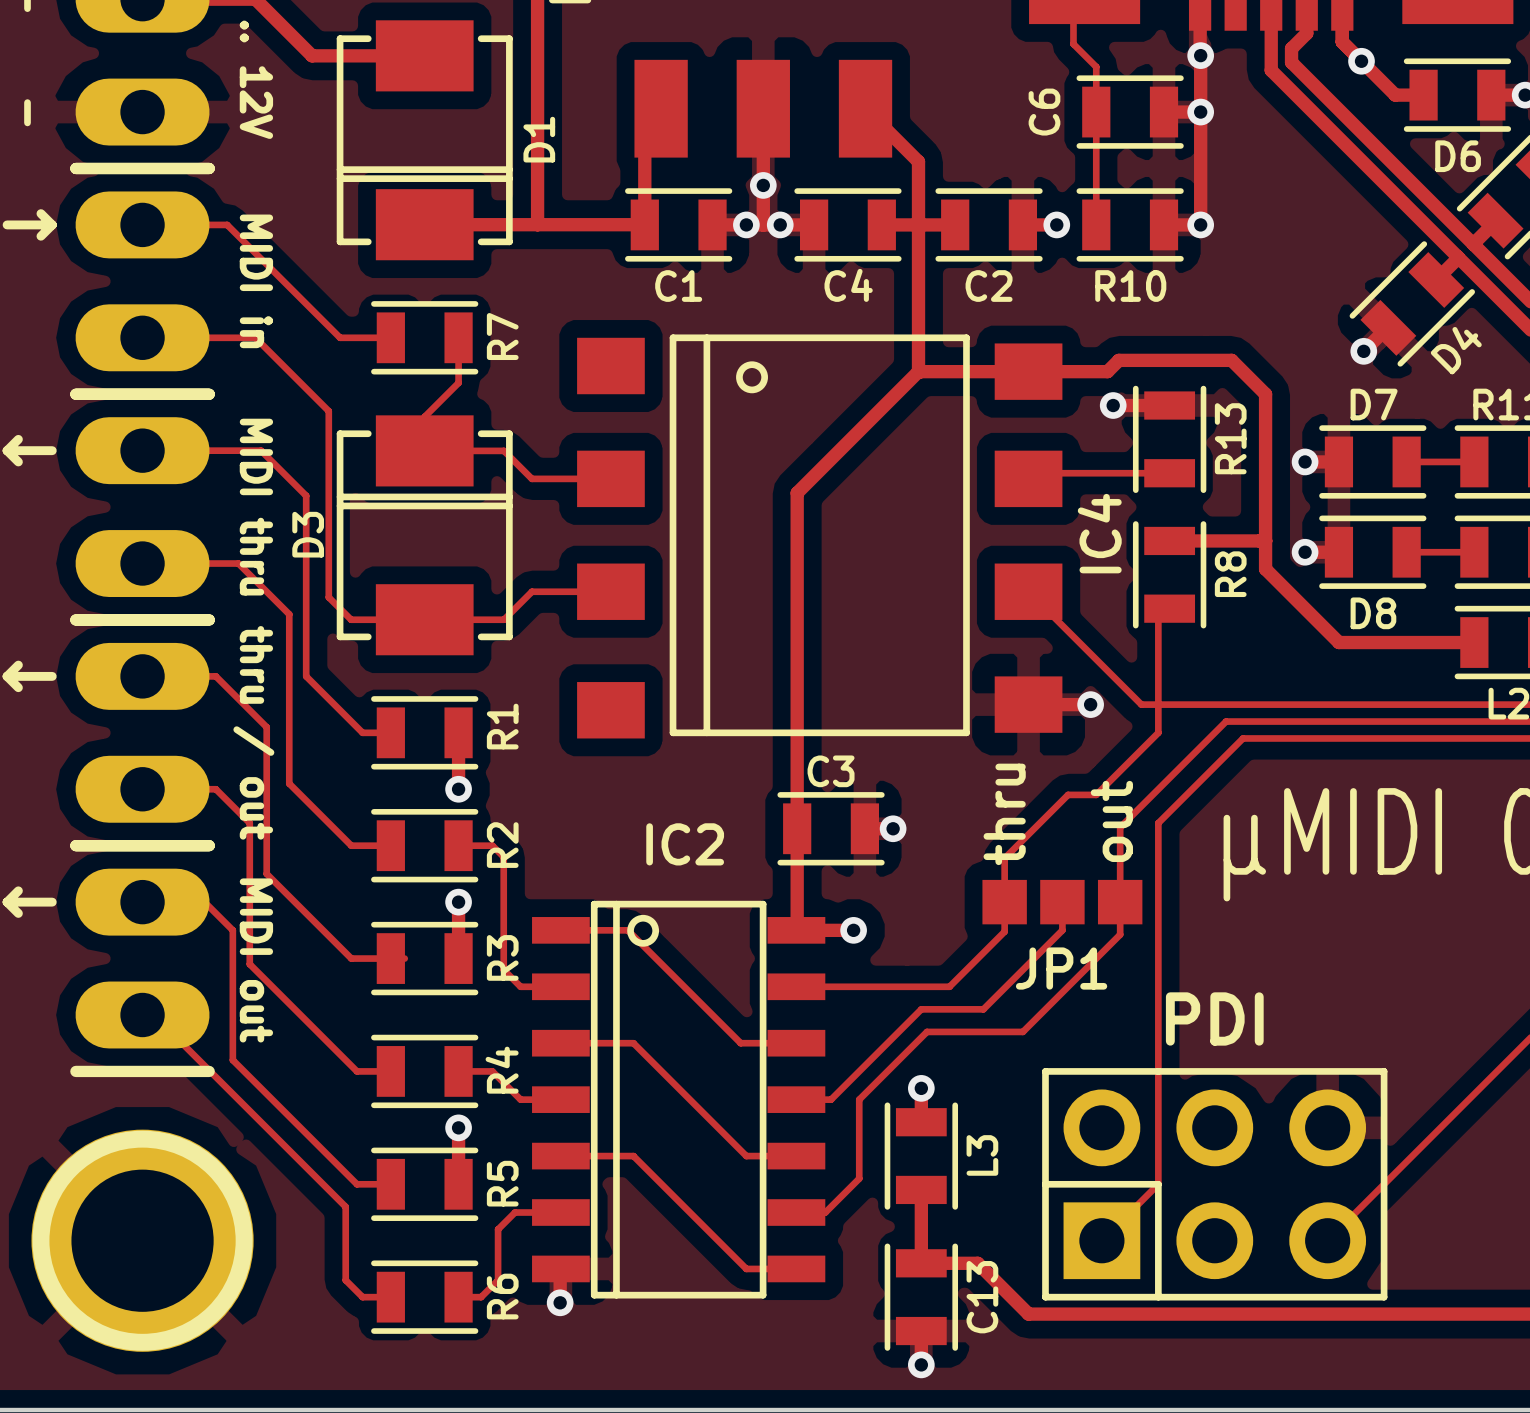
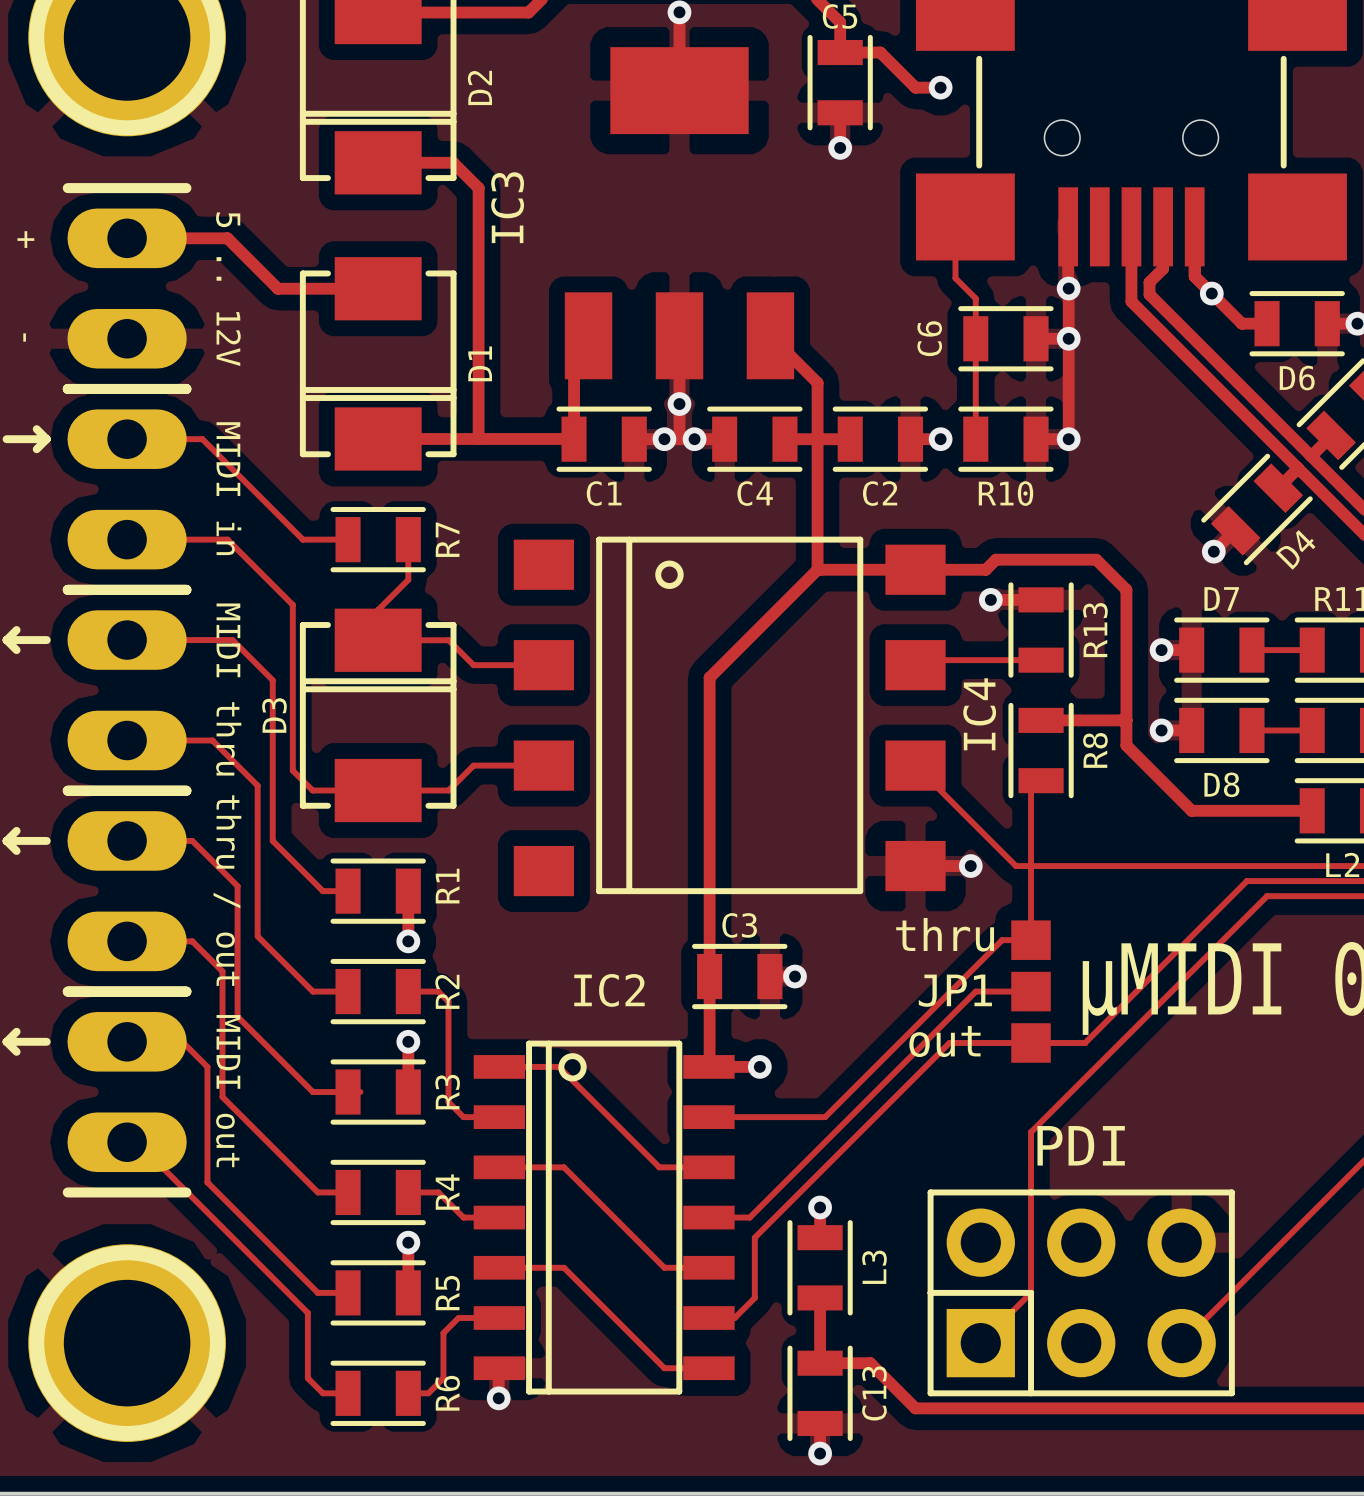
track: (1401, 721) (1226, 721) (1120, 827) (1120, 934) (1022, 1031) (926, 1031) (859, 1099) (859, 1178) (847, 1189) -> (1246, 881) (1085, 1042) (949, 1042) (754, 1237) (754, 1297)
track: (1158, 732) (1096, 794) (1068, 794) (1004, 858) (1004, 931) (949, 986) (926, 986) -> (1031, 891) (1031, 940) (1002, 940) (825, 1117)
track: (1423, 738) (1243, 738) (1158, 823) (1158, 1003) -> (1267, 896) (1031, 1132)
text rotation: 0° (1004, 814) -> 90° clockwise (945, 934)
text rotation: 0° (1111, 821) -> 90° clockwise (944, 1041)
track: (1062, 902) (1062, 930) (983, 1009) (921, 1009) (831, 1099) -> (1031, 991) (975, 991) (749, 1217) (739, 1217)
JP1 rotation: 0° (1062, 902) -> 90° clockwise (1031, 991)
JP1 position: (1062, 902) -> (1031, 991)

